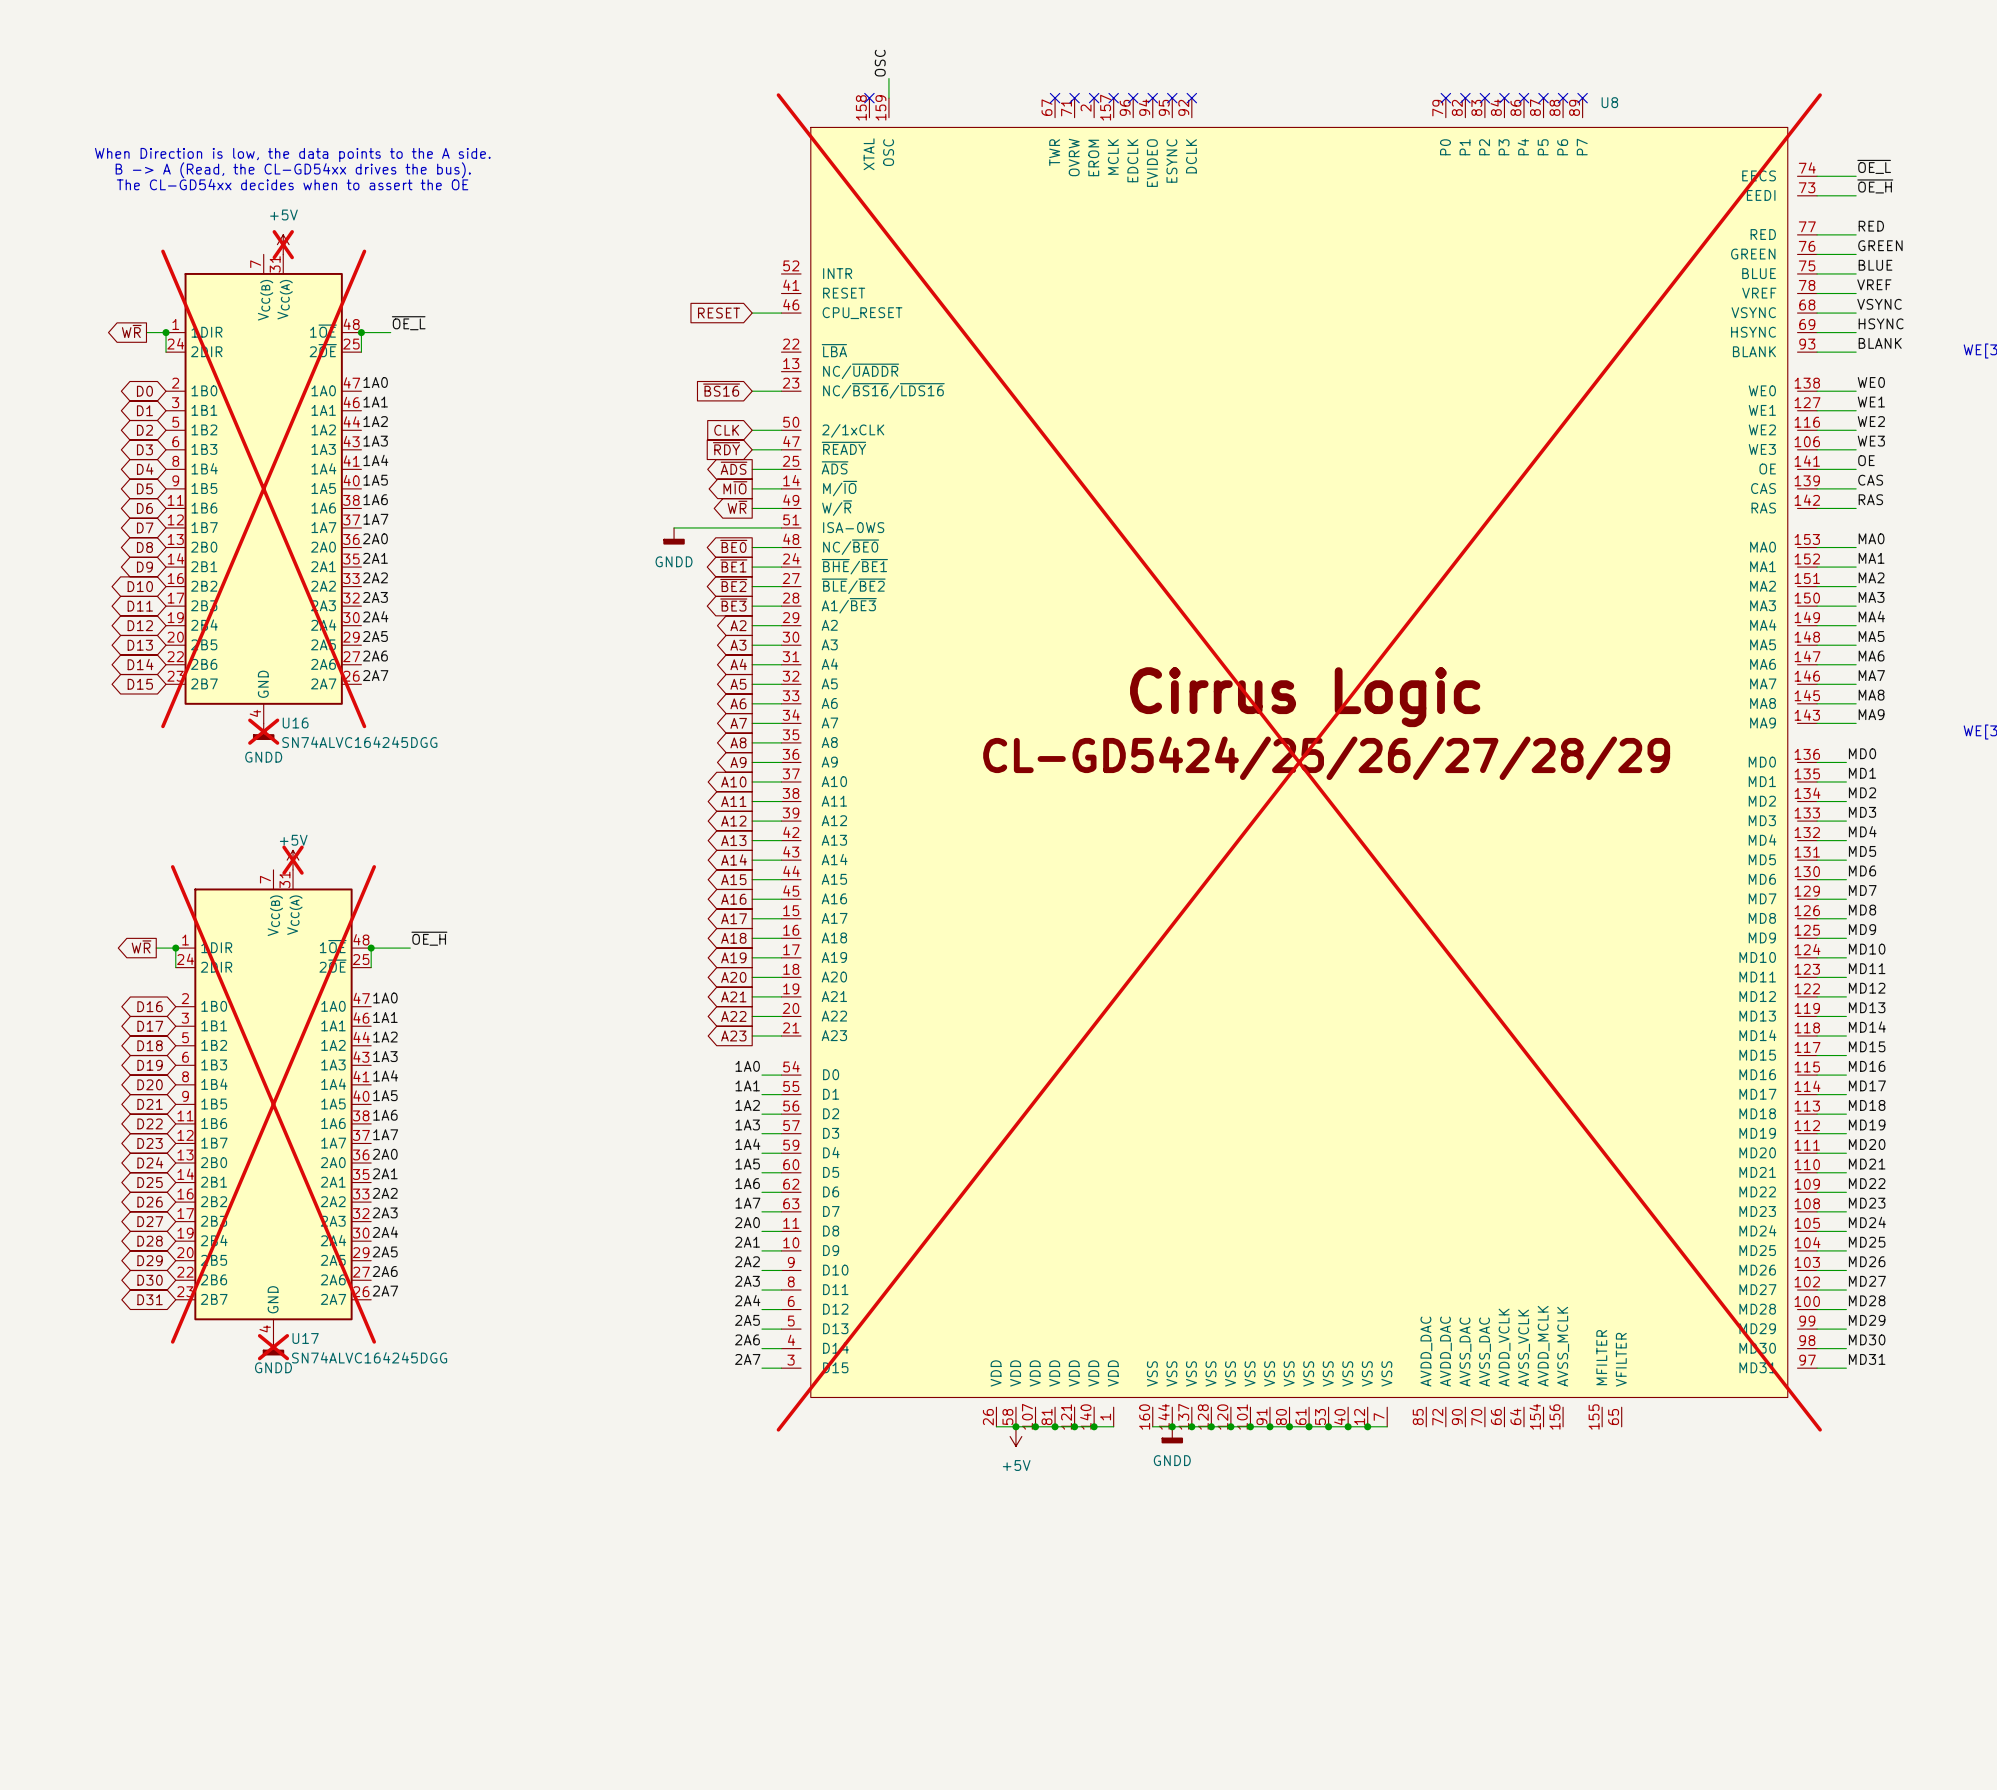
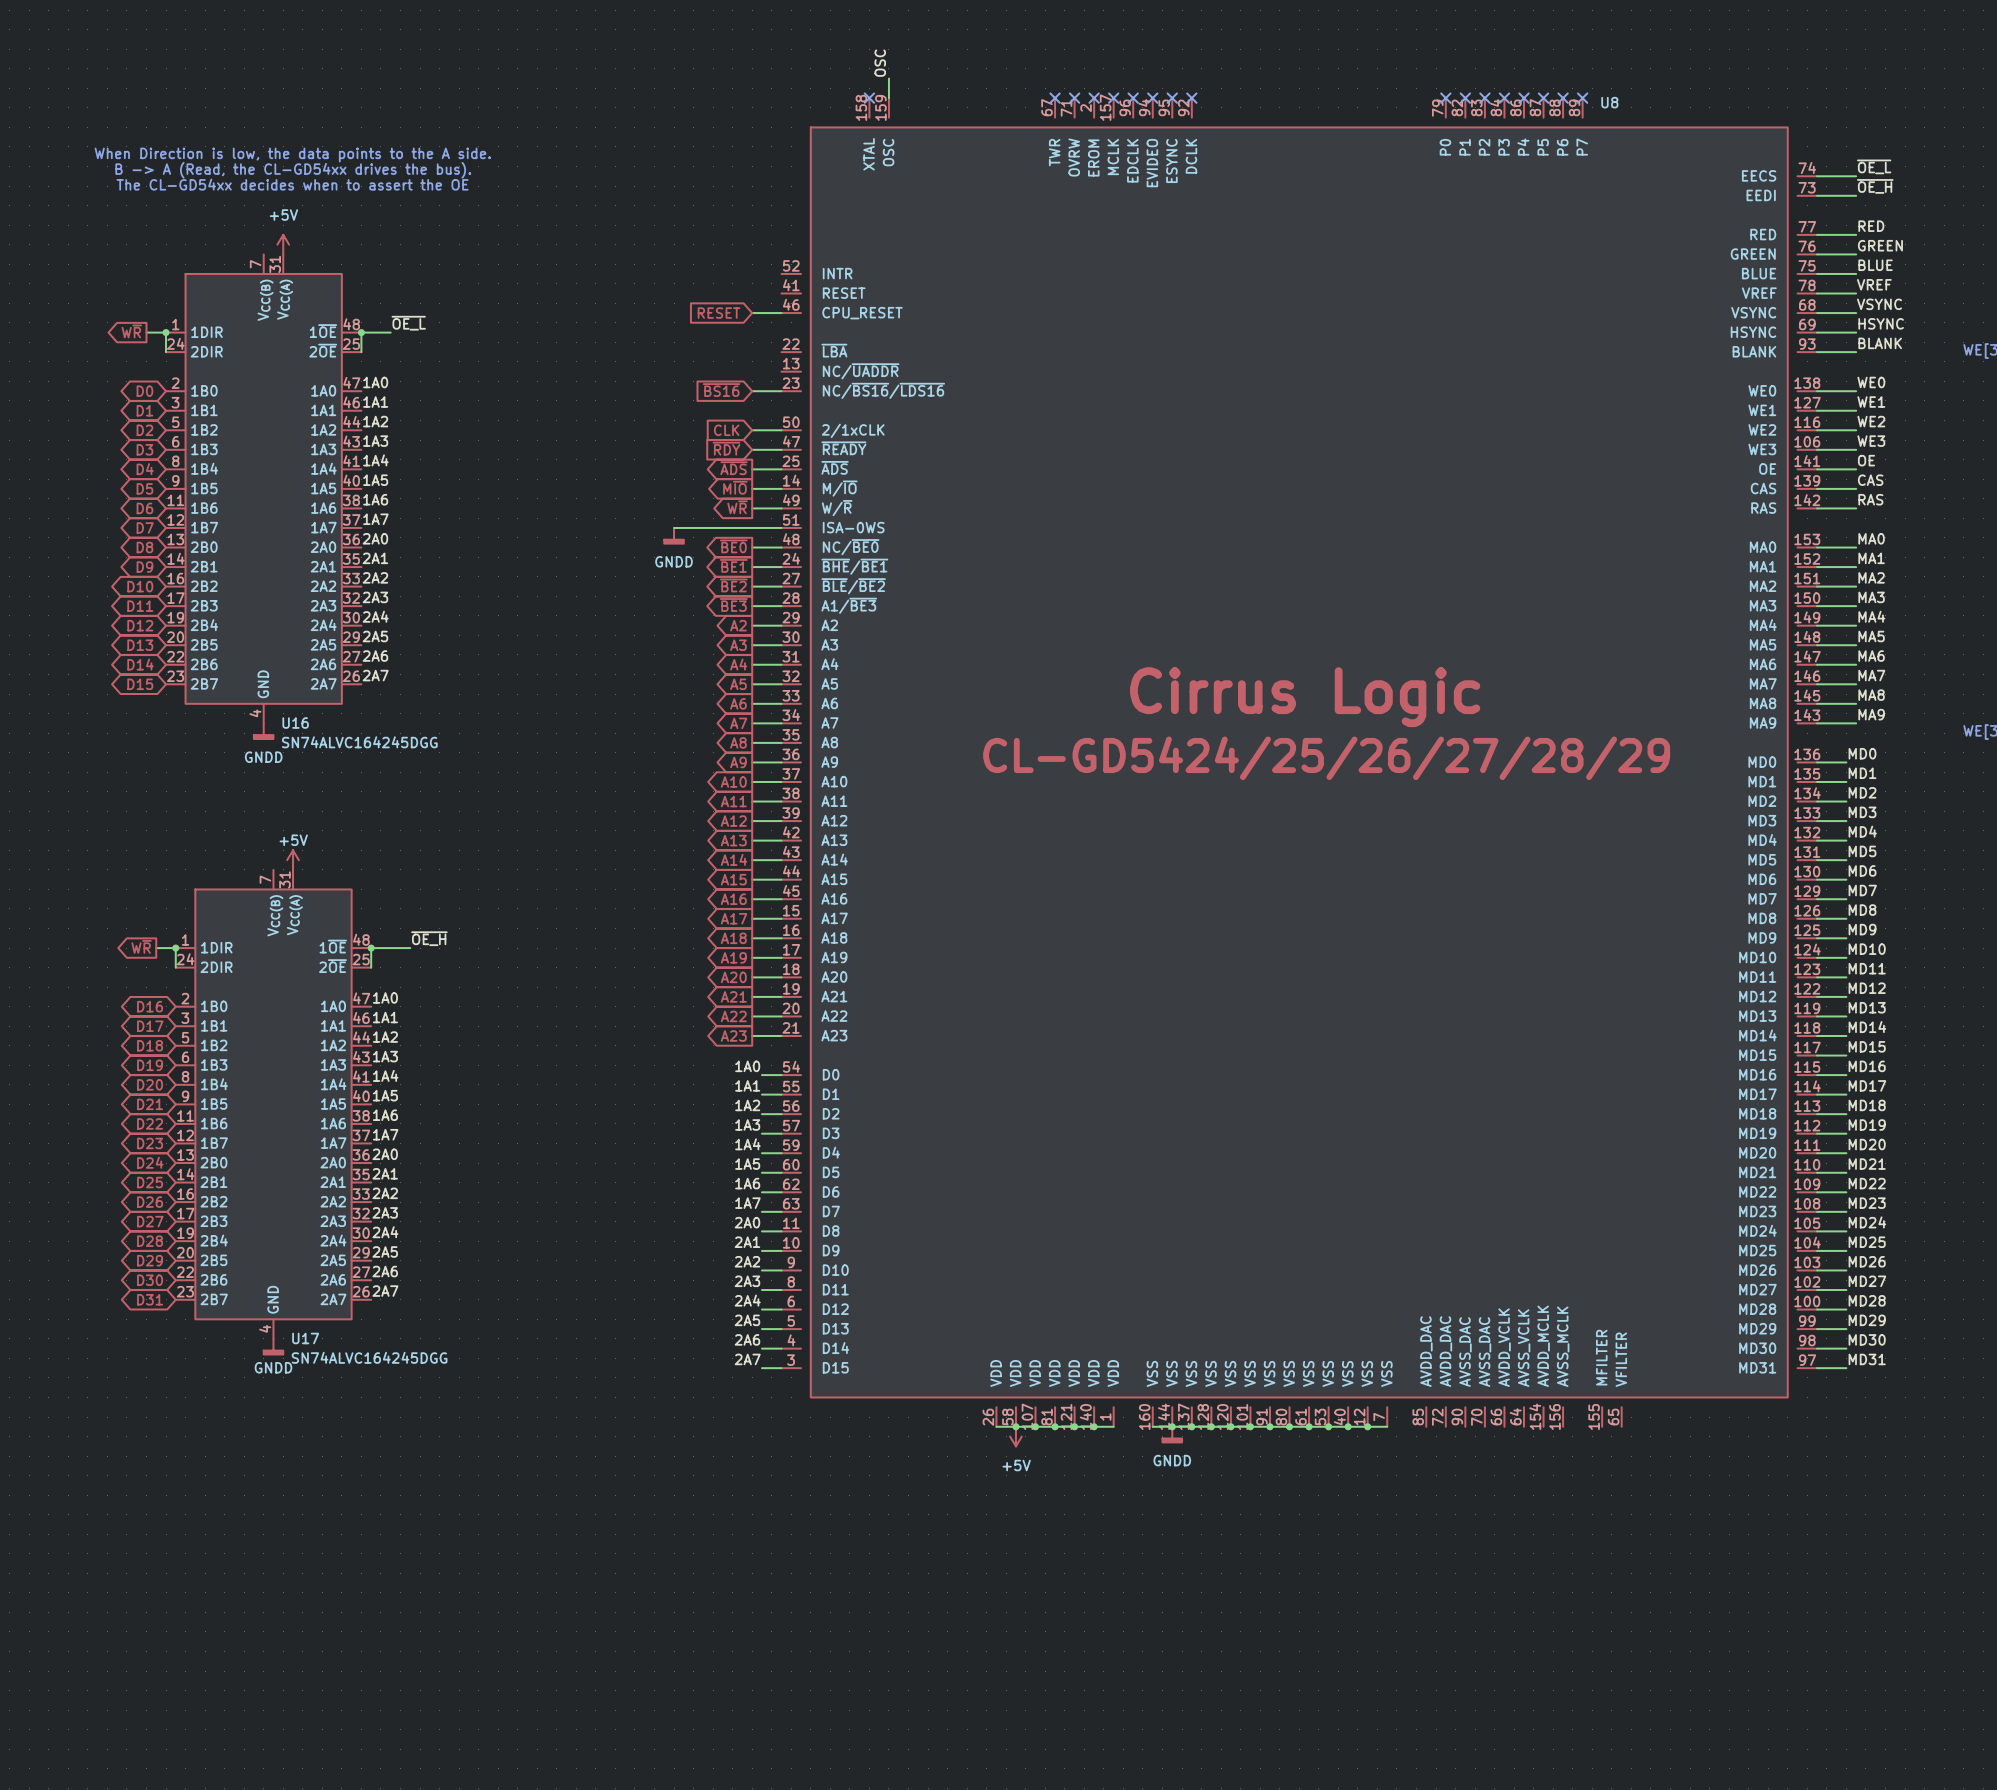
power symbol do-not-place cross: (283, 244) -> none
U16 do-not-place cross: (263, 488) -> none
power symbol do-not-place cross: (263, 731) -> none
U8 do-not-place cross: (1299, 762) -> none
power symbol do-not-place cross: (293, 860) -> none
U17 do-not-place cross: (273, 1104) -> none
power symbol do-not-place cross: (273, 1347) -> none

